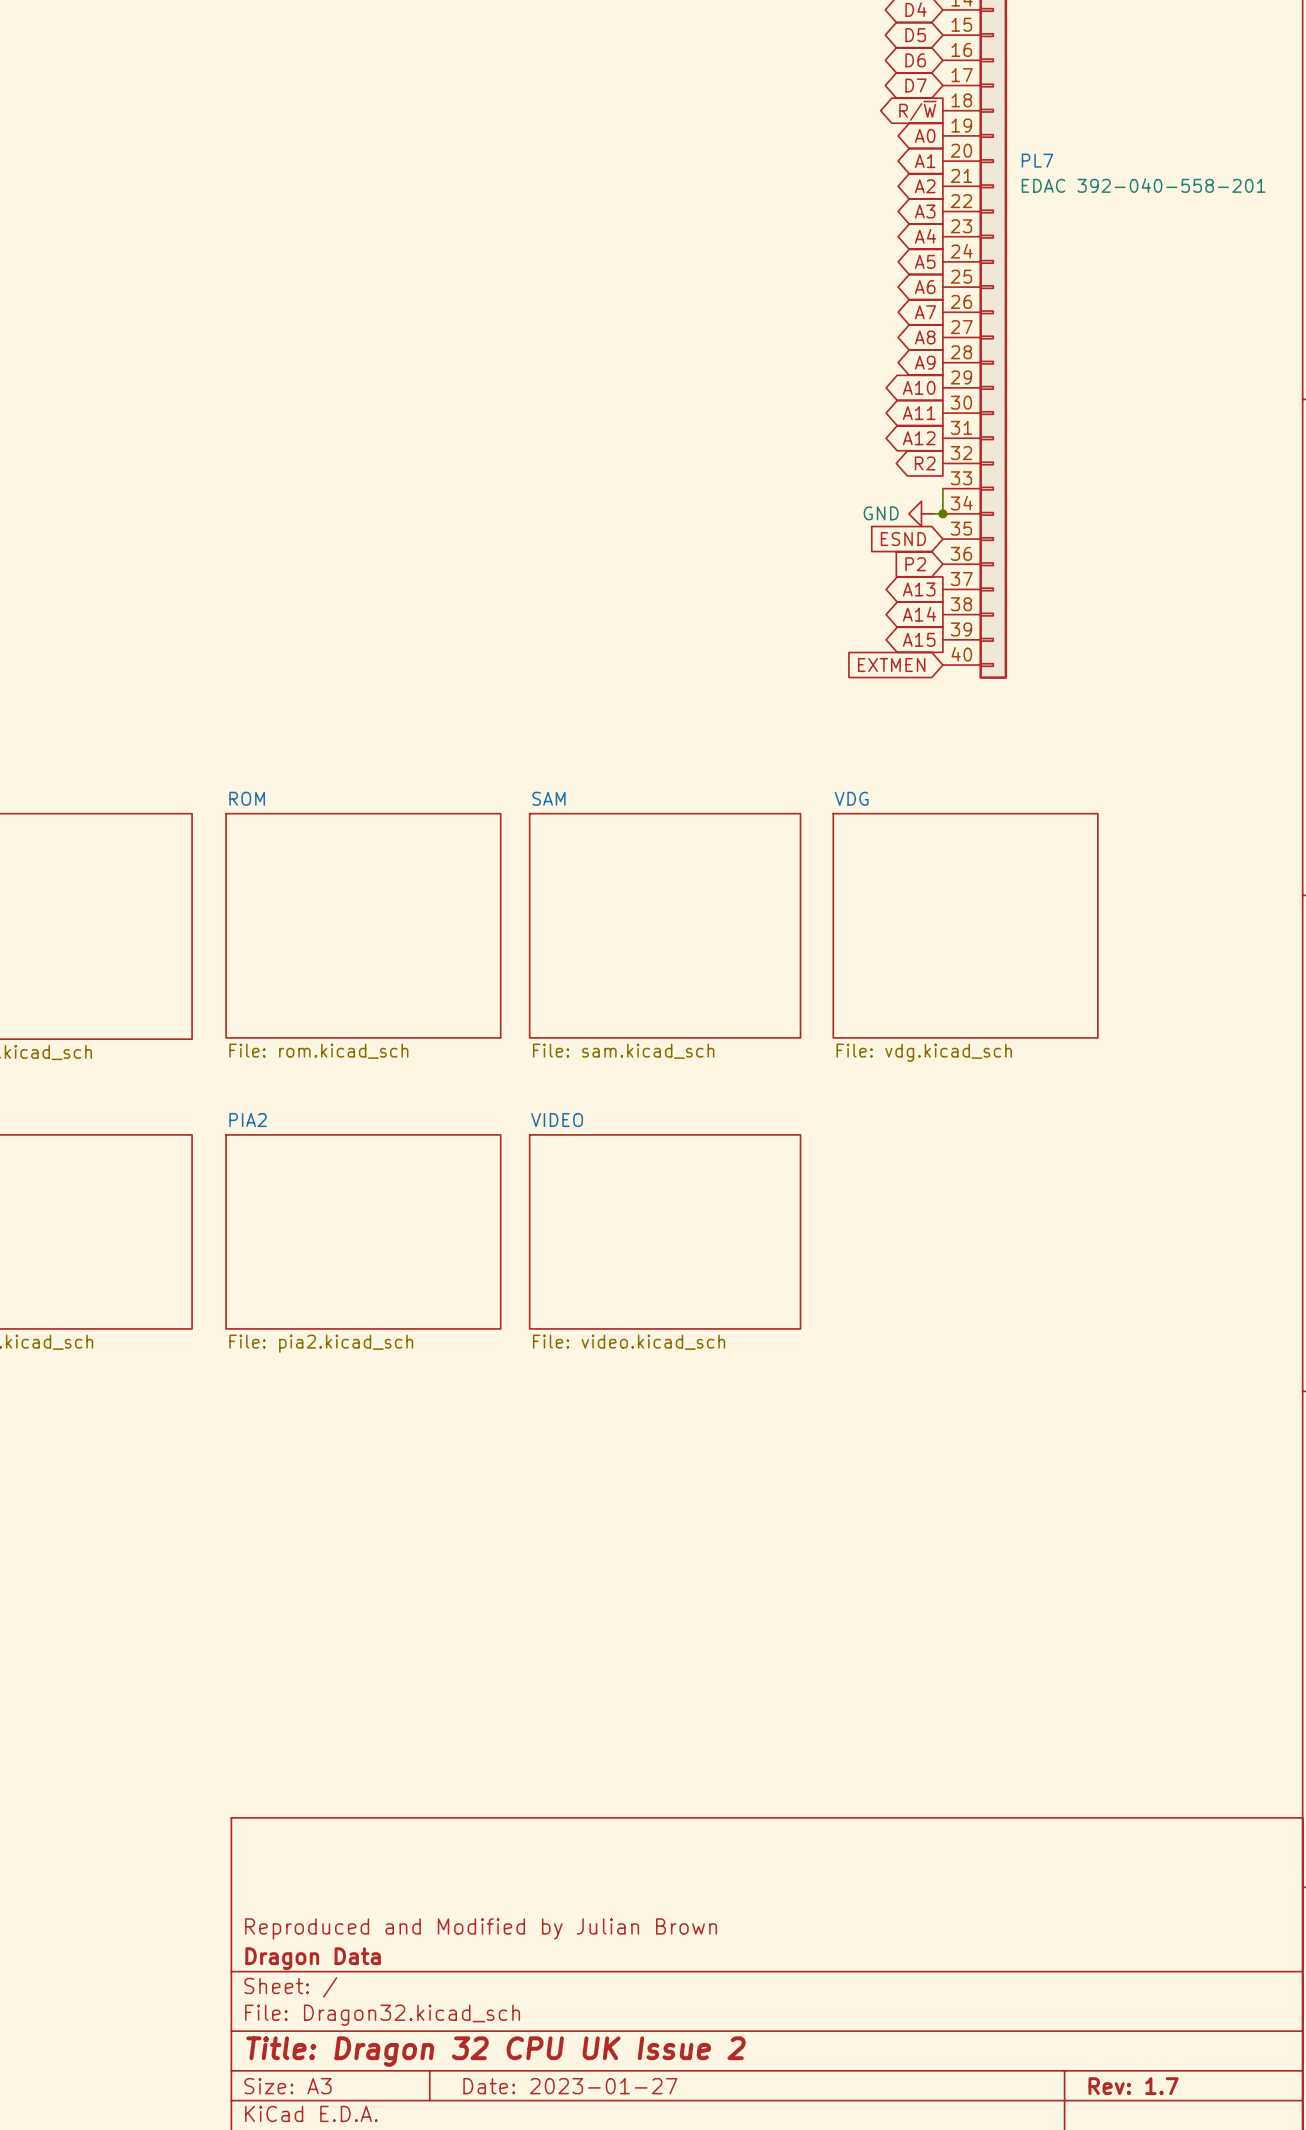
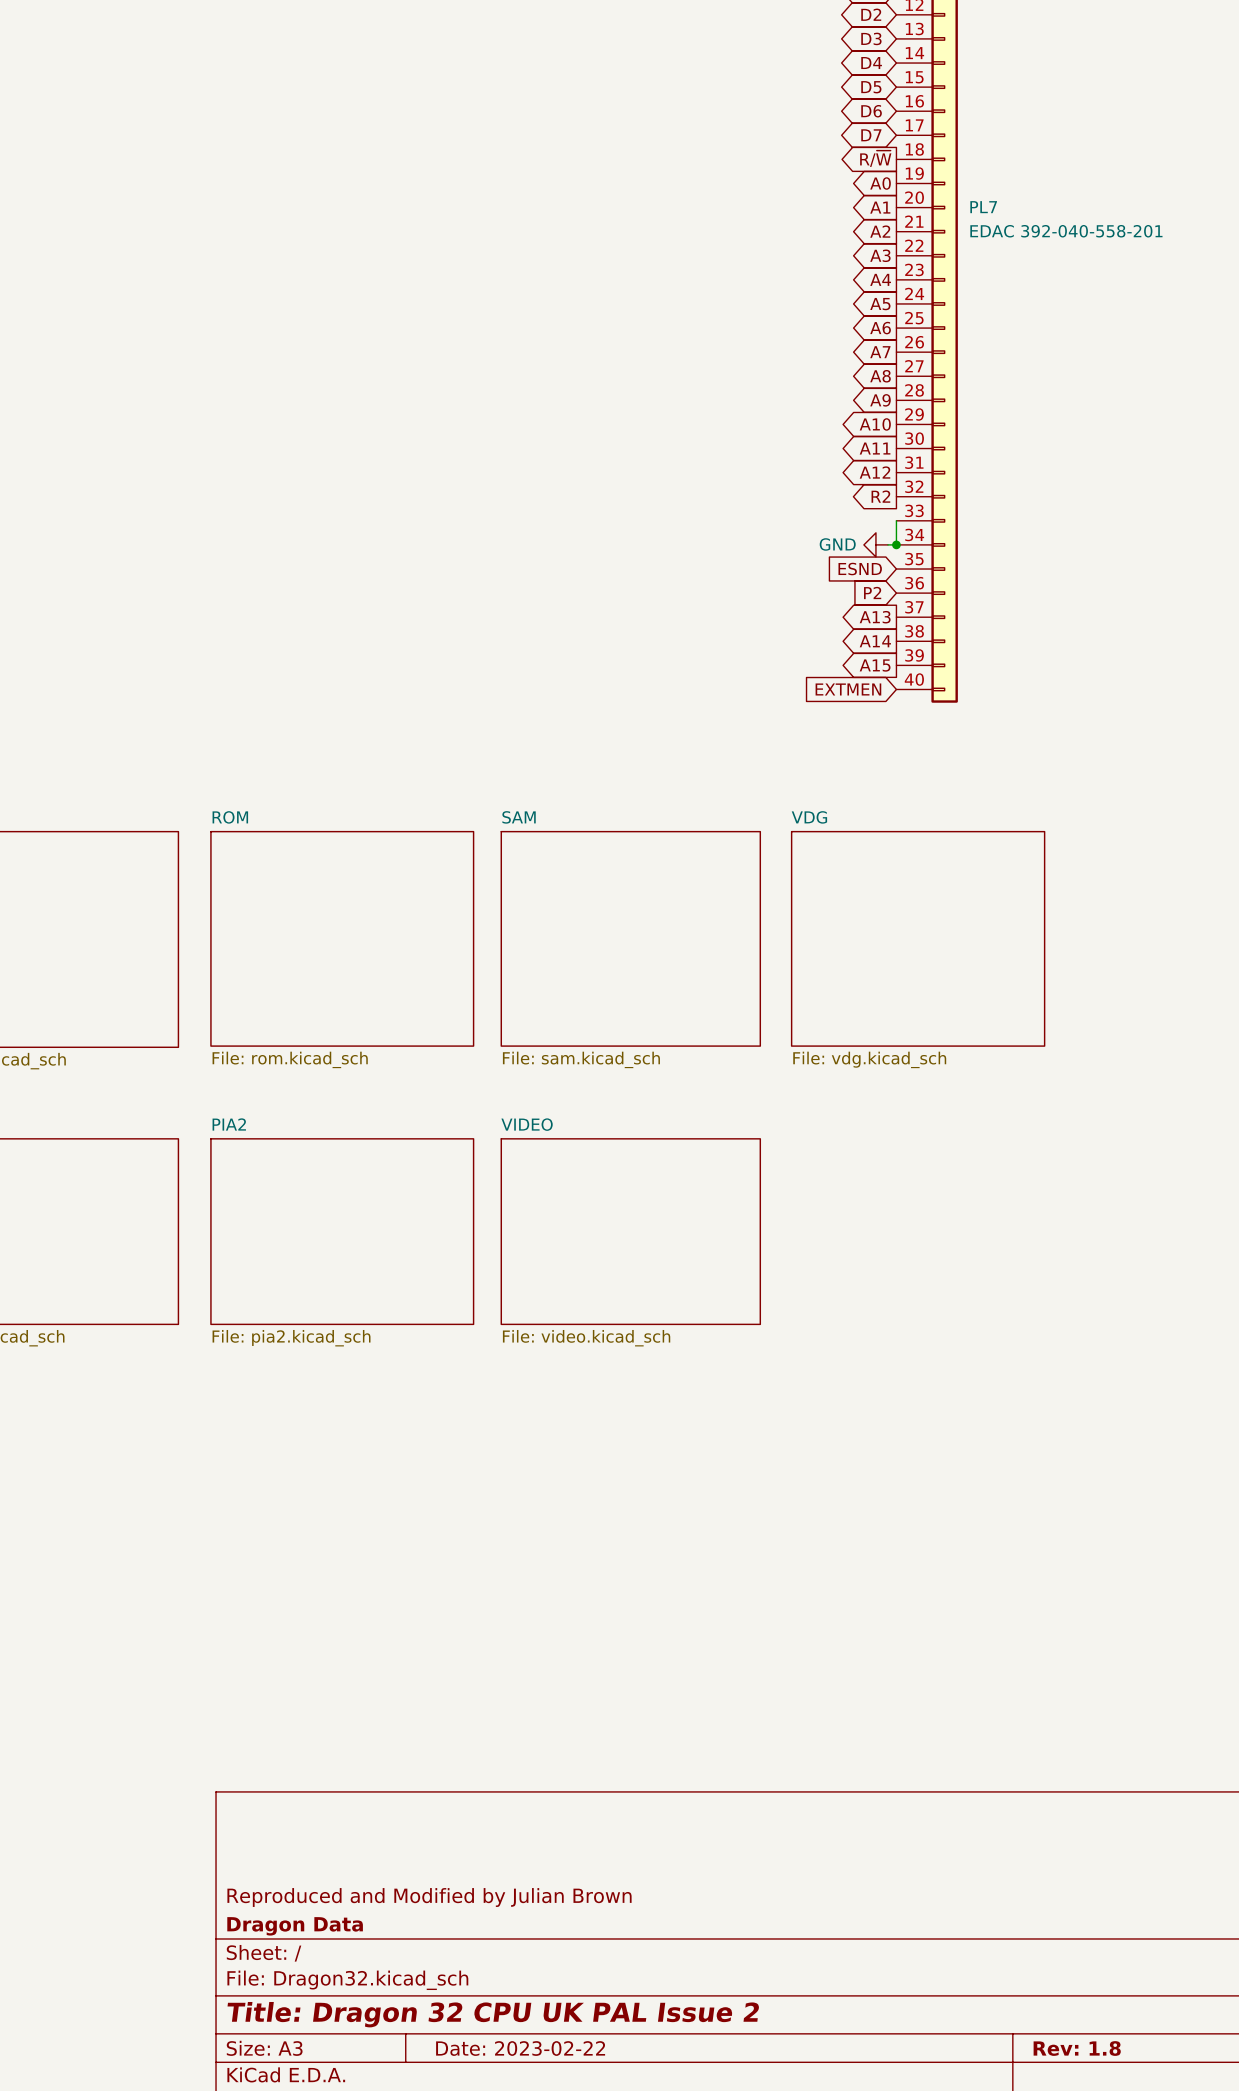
title block: Title: Dragon 32 CPU UK Issue 2 (496, 2051) -> Title: Dragon 32 CPU UK PAL Issue 2 (493, 2014)
title block: Date: 2023-01-27 (570, 2086) -> Date: 2023-02-22 (520, 2048)
title block: Rev: 1.7 (1133, 2086) -> Rev: 1.8 (1077, 2048)

